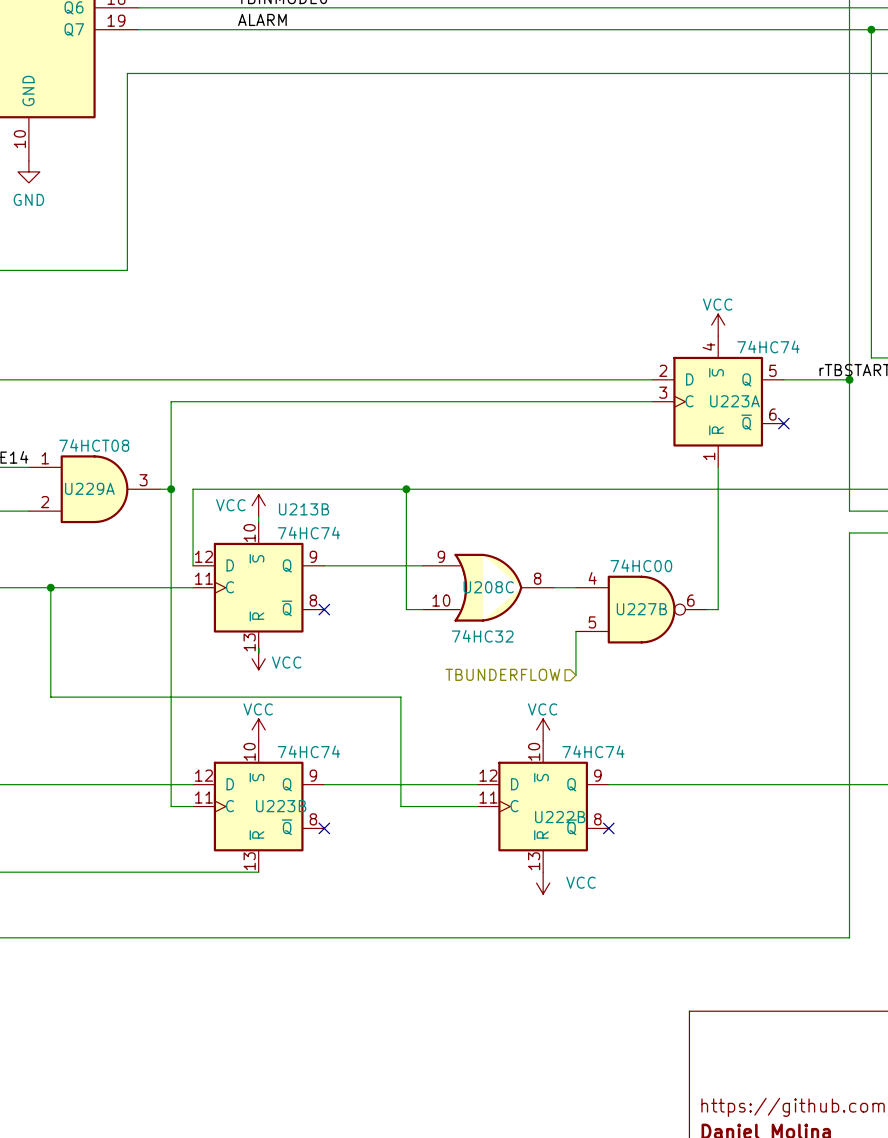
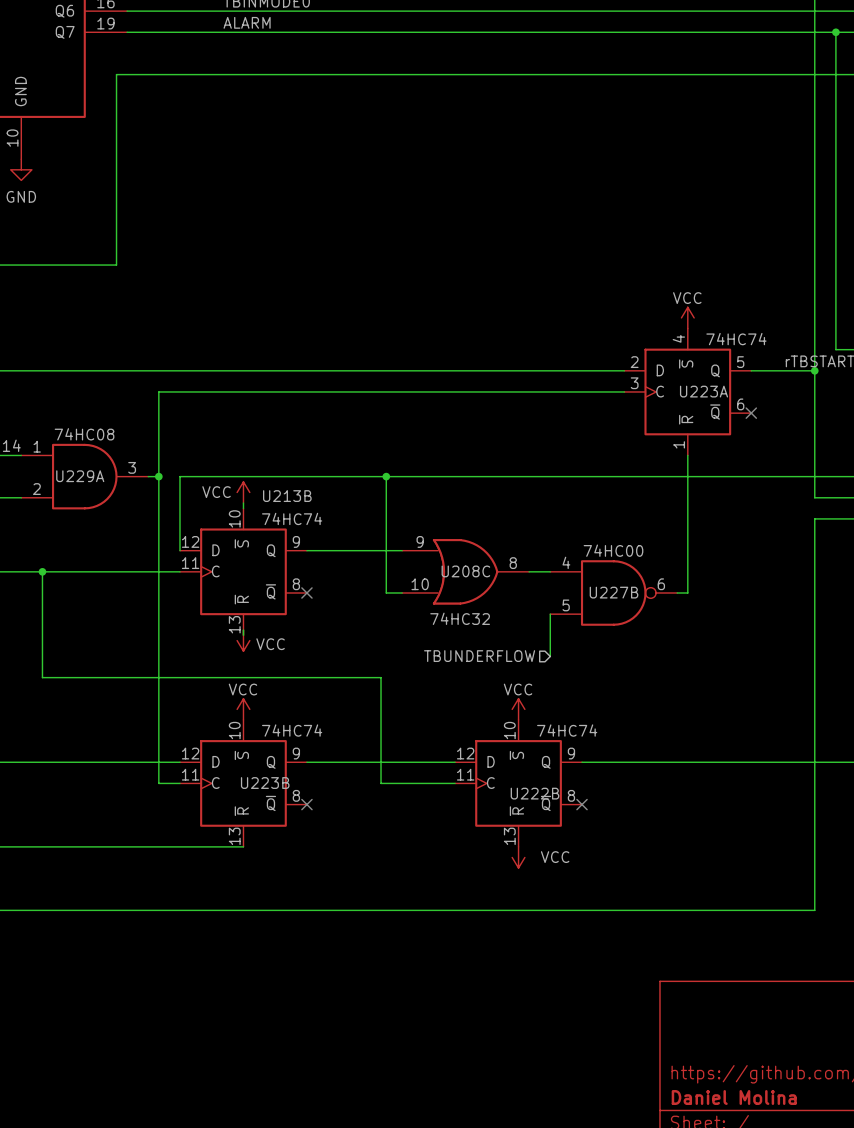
U229A value: 74HCT08 (94, 445) -> 74HC08 (84, 434)

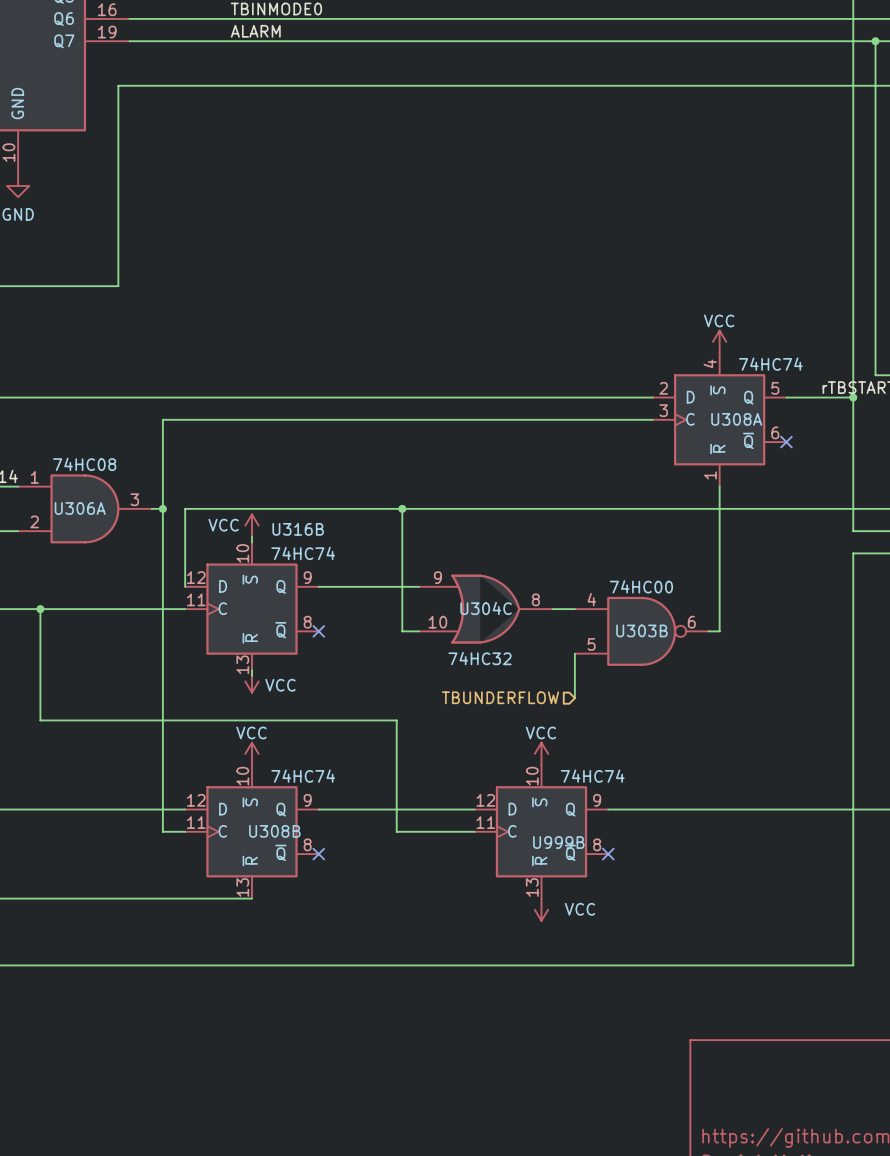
U223A name: U223A (704, 391) -> U308A (736, 419)
U229A name: U229A (80, 476) -> U306A (80, 508)
U213B name: U213B (287, 496) -> U316B (298, 529)
U208C name: U208C (465, 571) -> U304C (486, 608)
U227B name: U227B (614, 592) -> U303B (641, 630)
U223B name: U223B (265, 783) -> U308B (274, 831)
U222B name: U222B (534, 793) -> U999B (558, 842)

